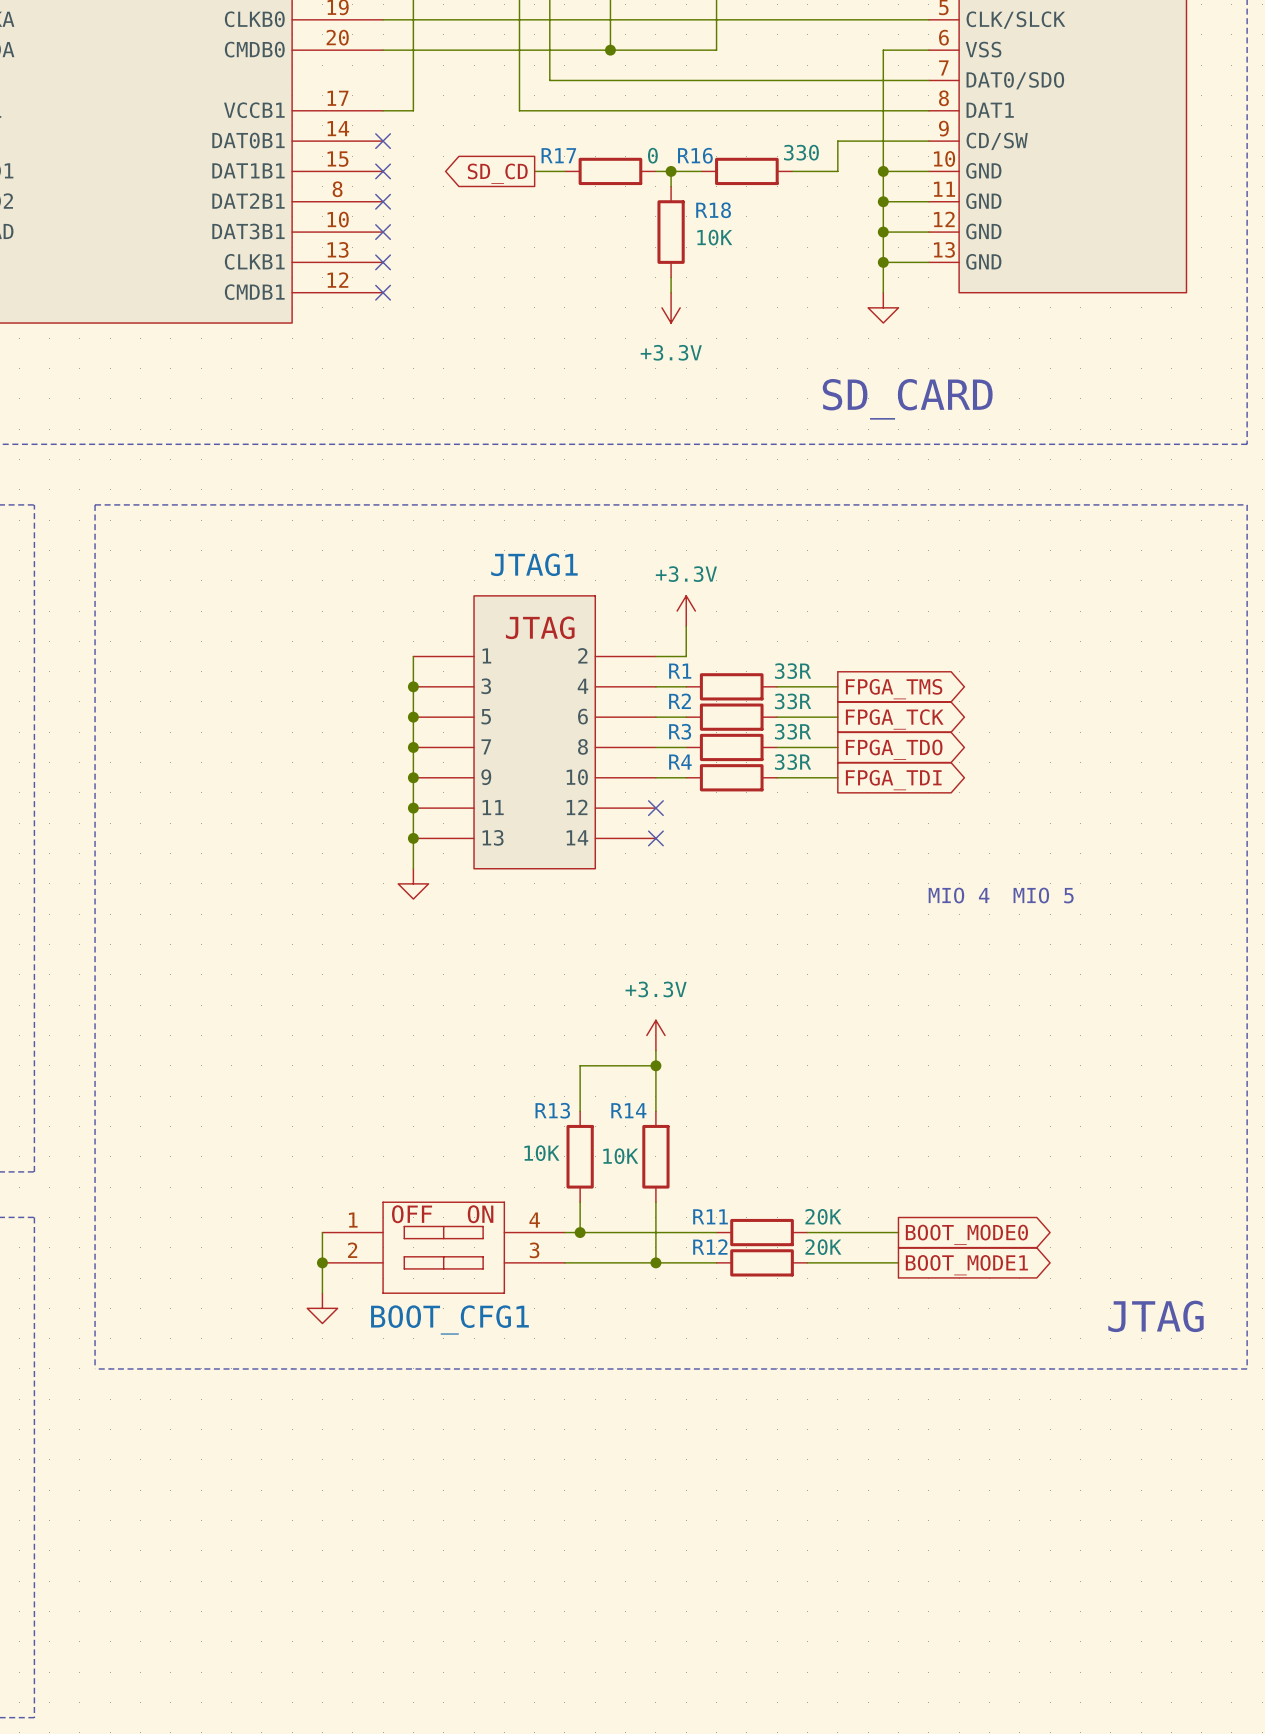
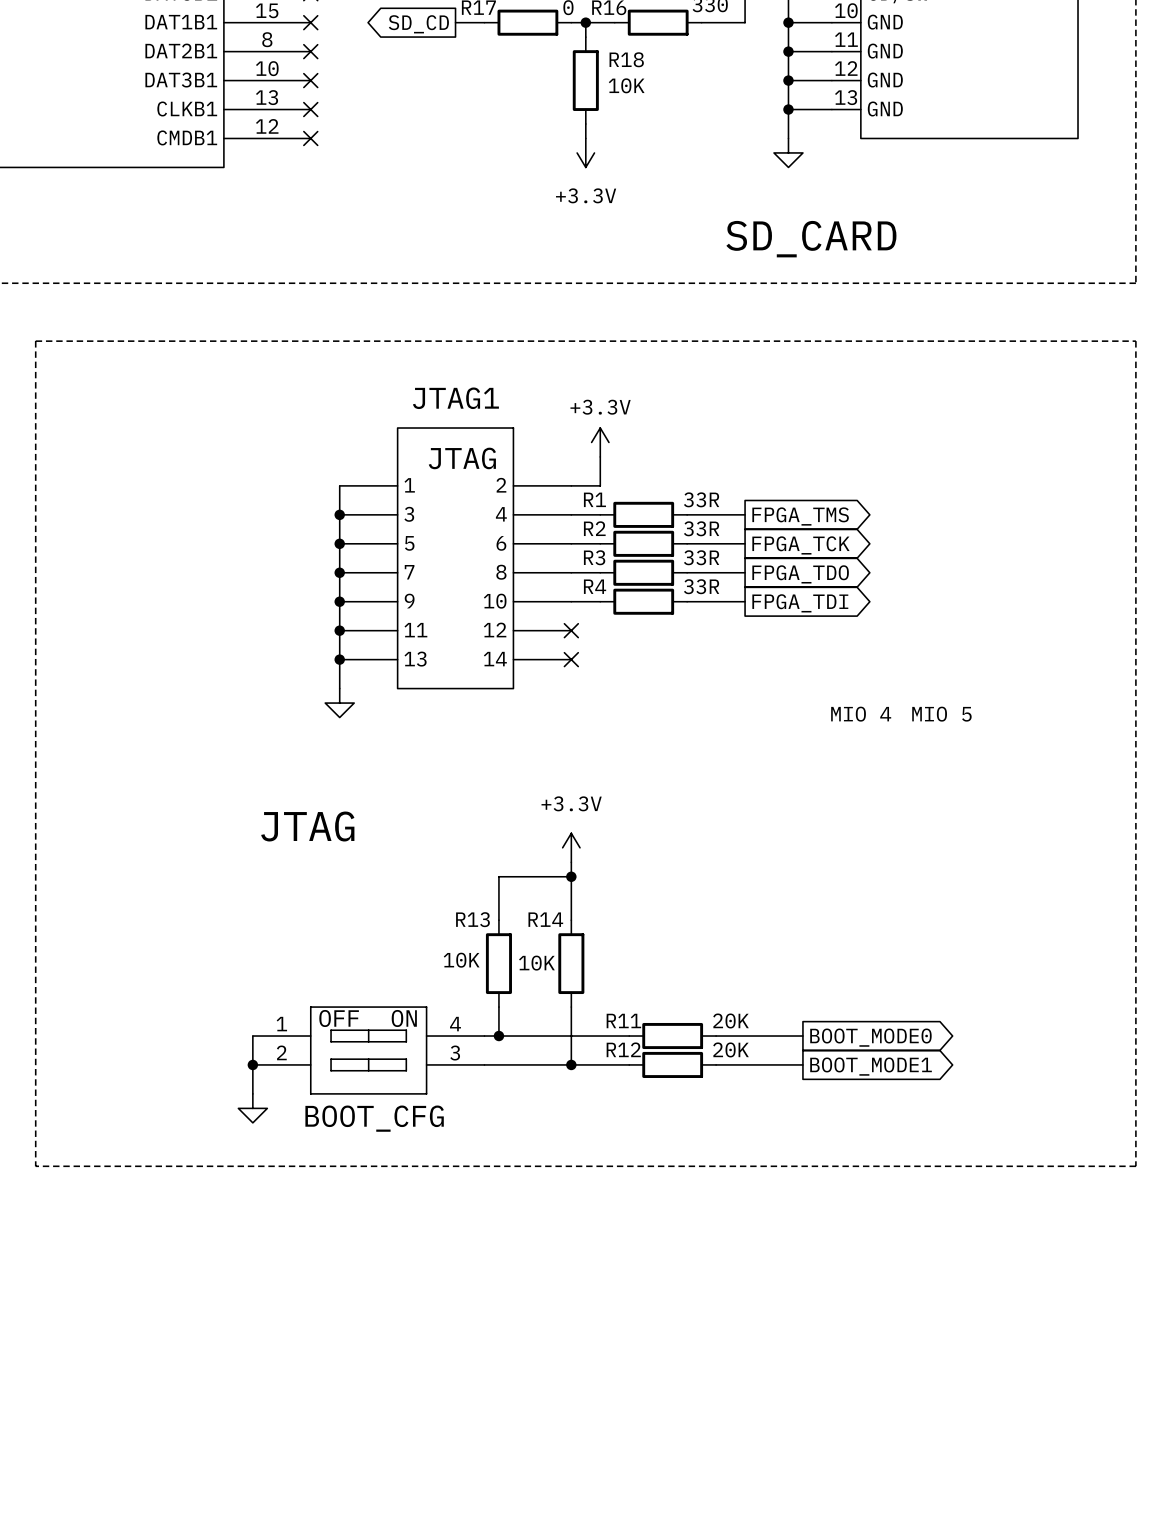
text: none -> JTAG (307, 826)
text: JTAG (1155, 1316) -> none
BOOT_CFG1 name: BOOT_CFG1 (449, 1319) -> BOOT_CFG (374, 1118)

